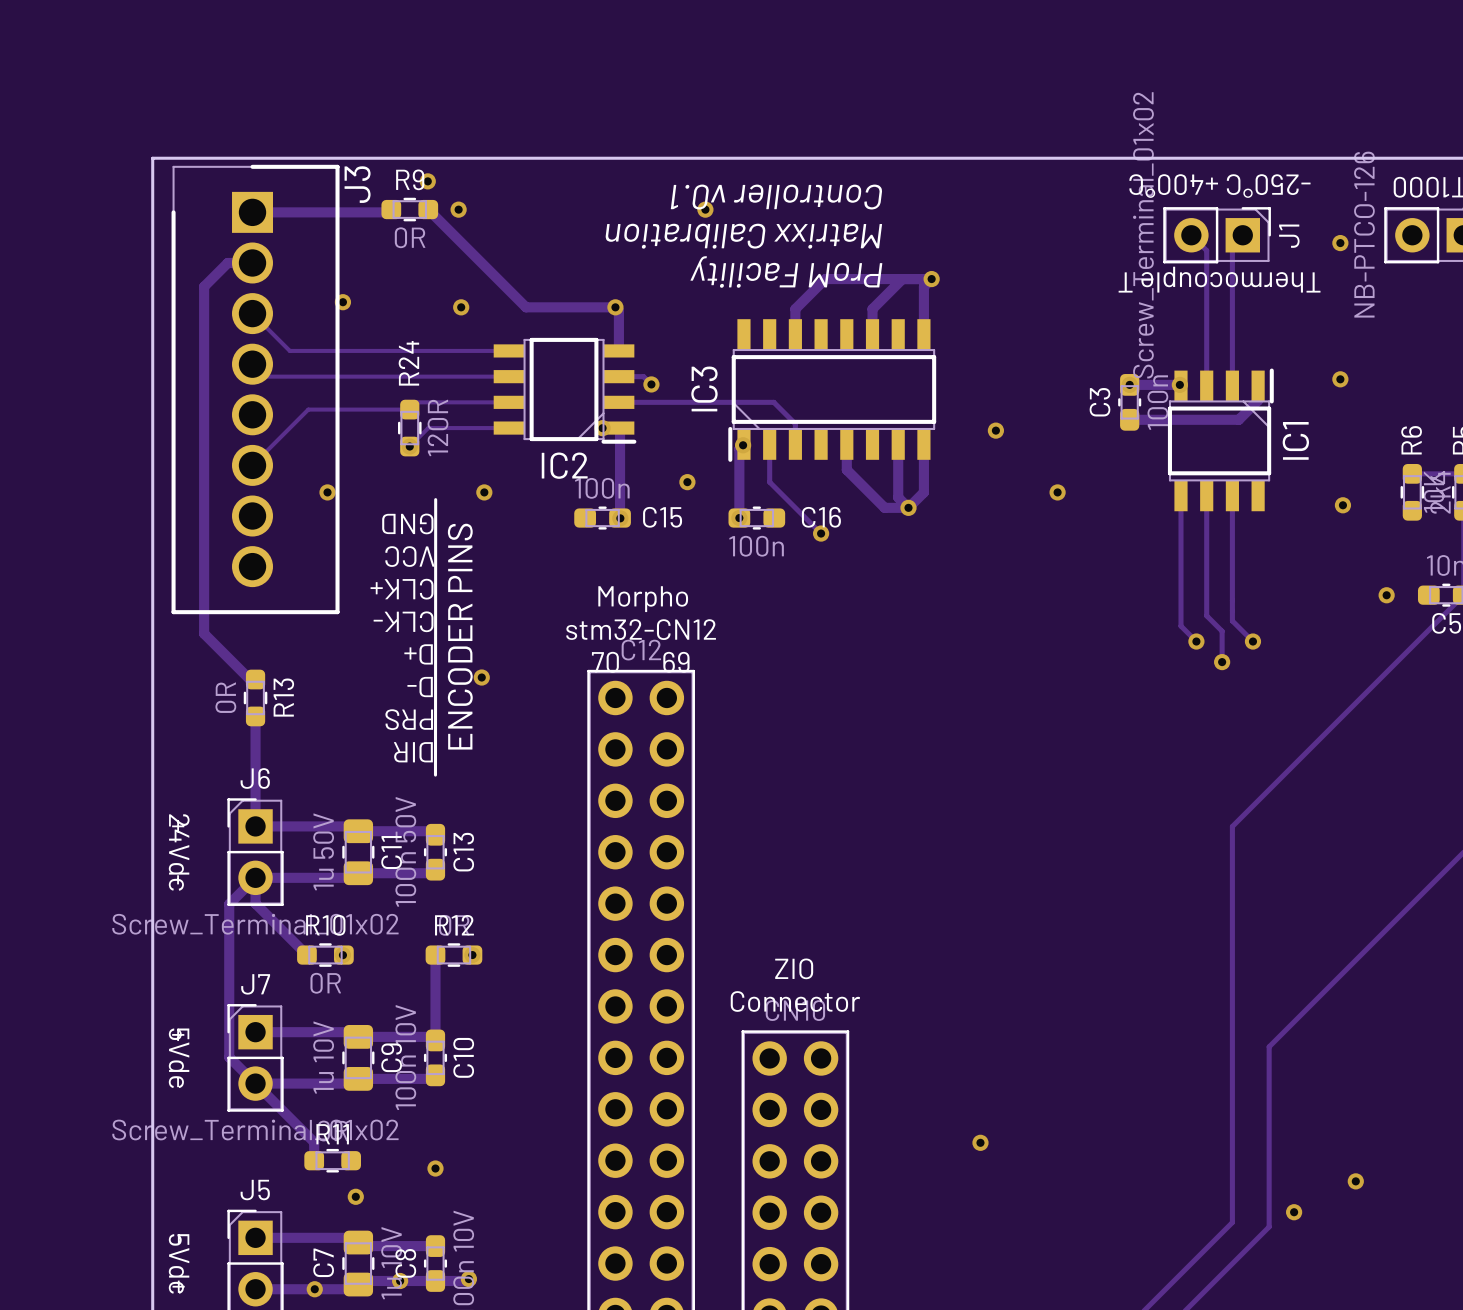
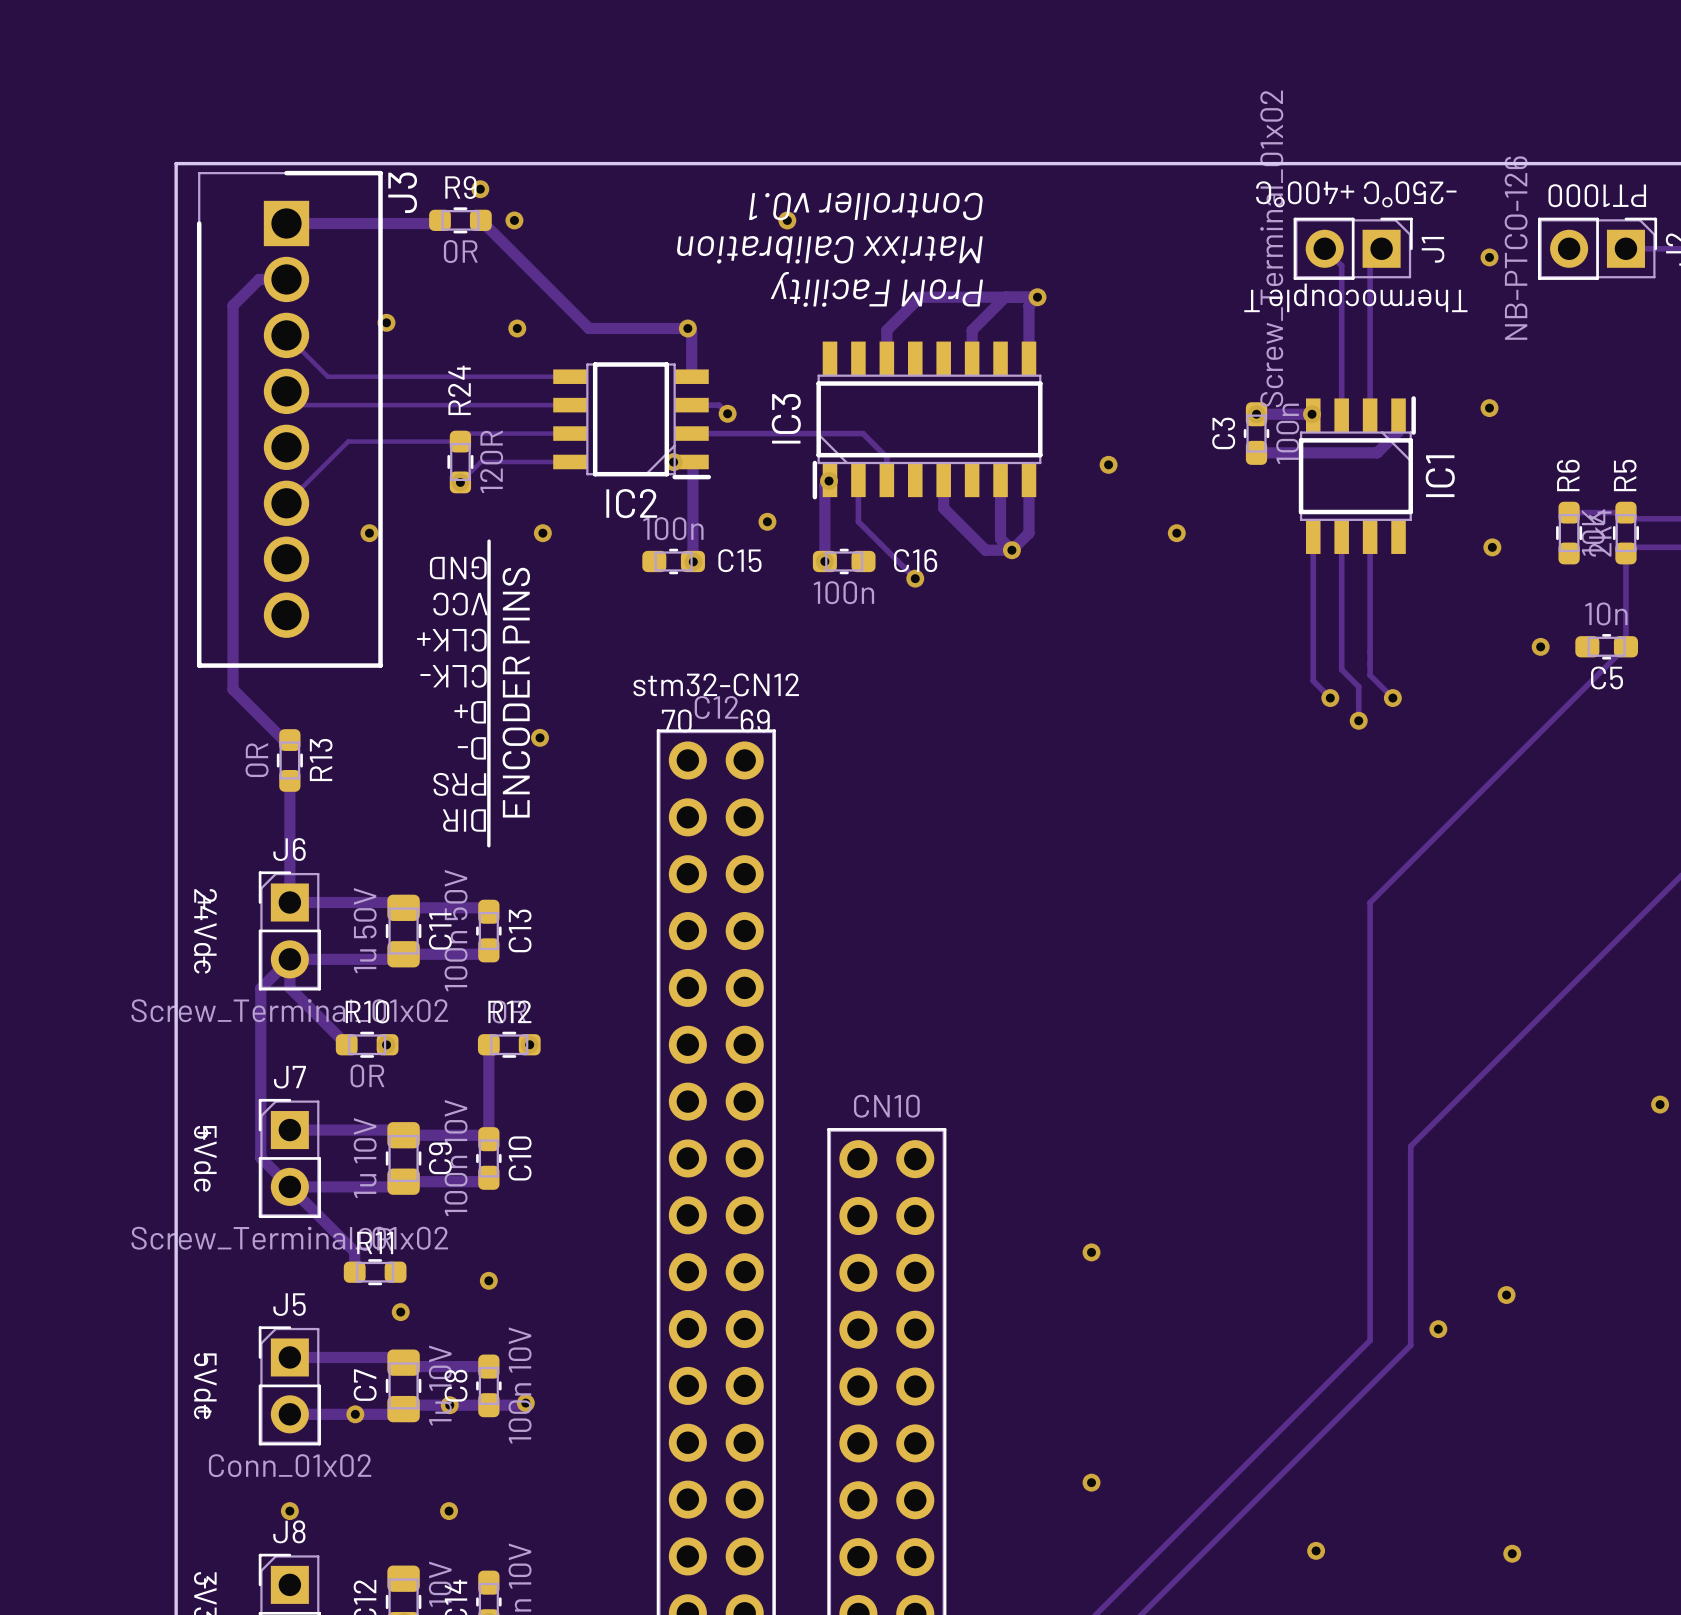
text: Morpho (643, 599) -> none
text: ZIO (794, 968) -> none
text: Connector (795, 1001) -> none

